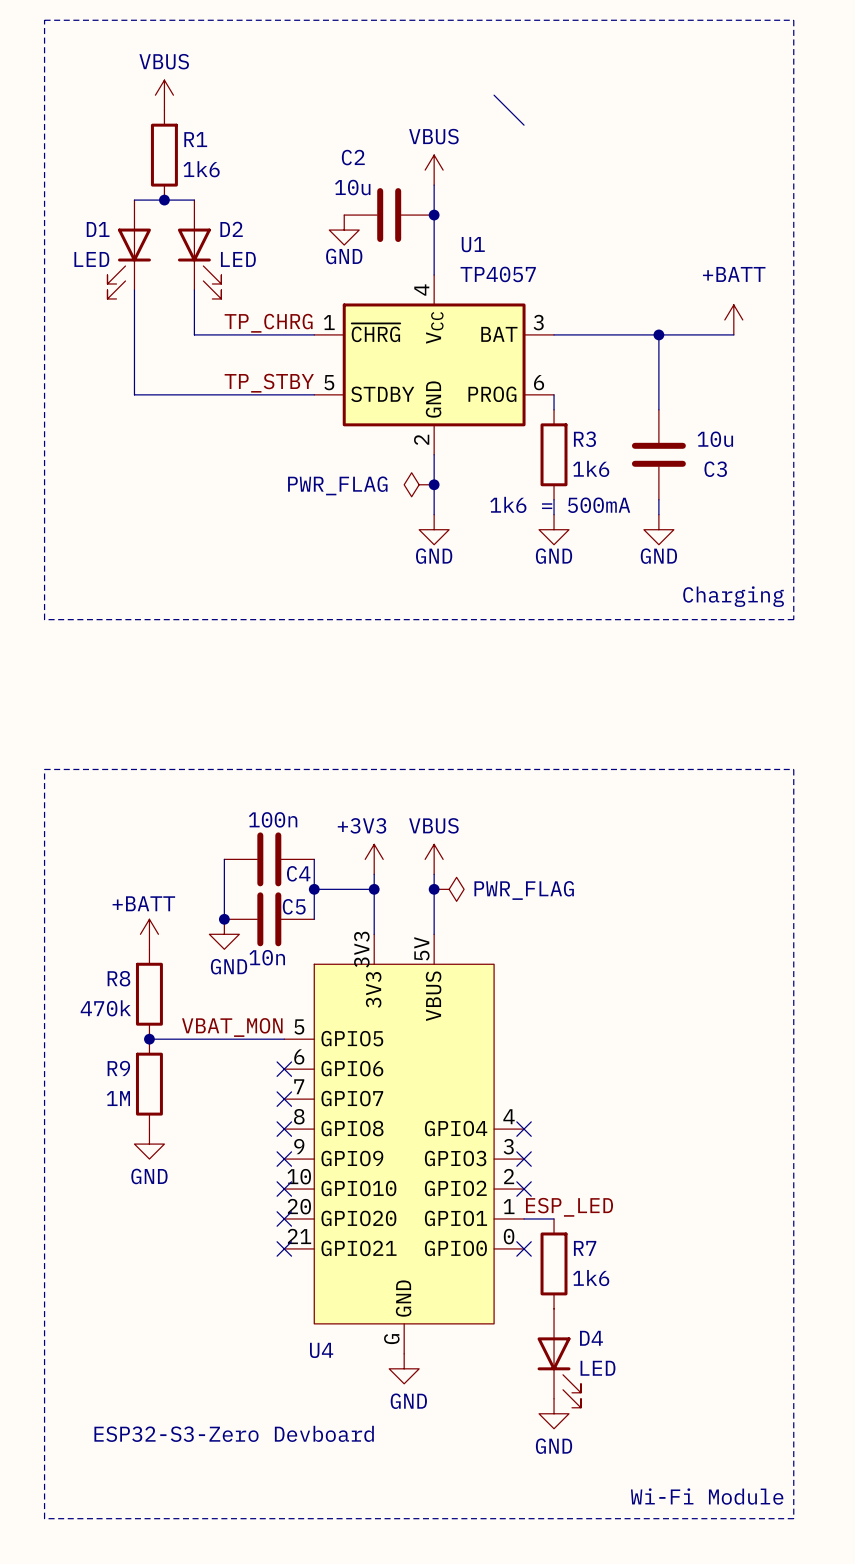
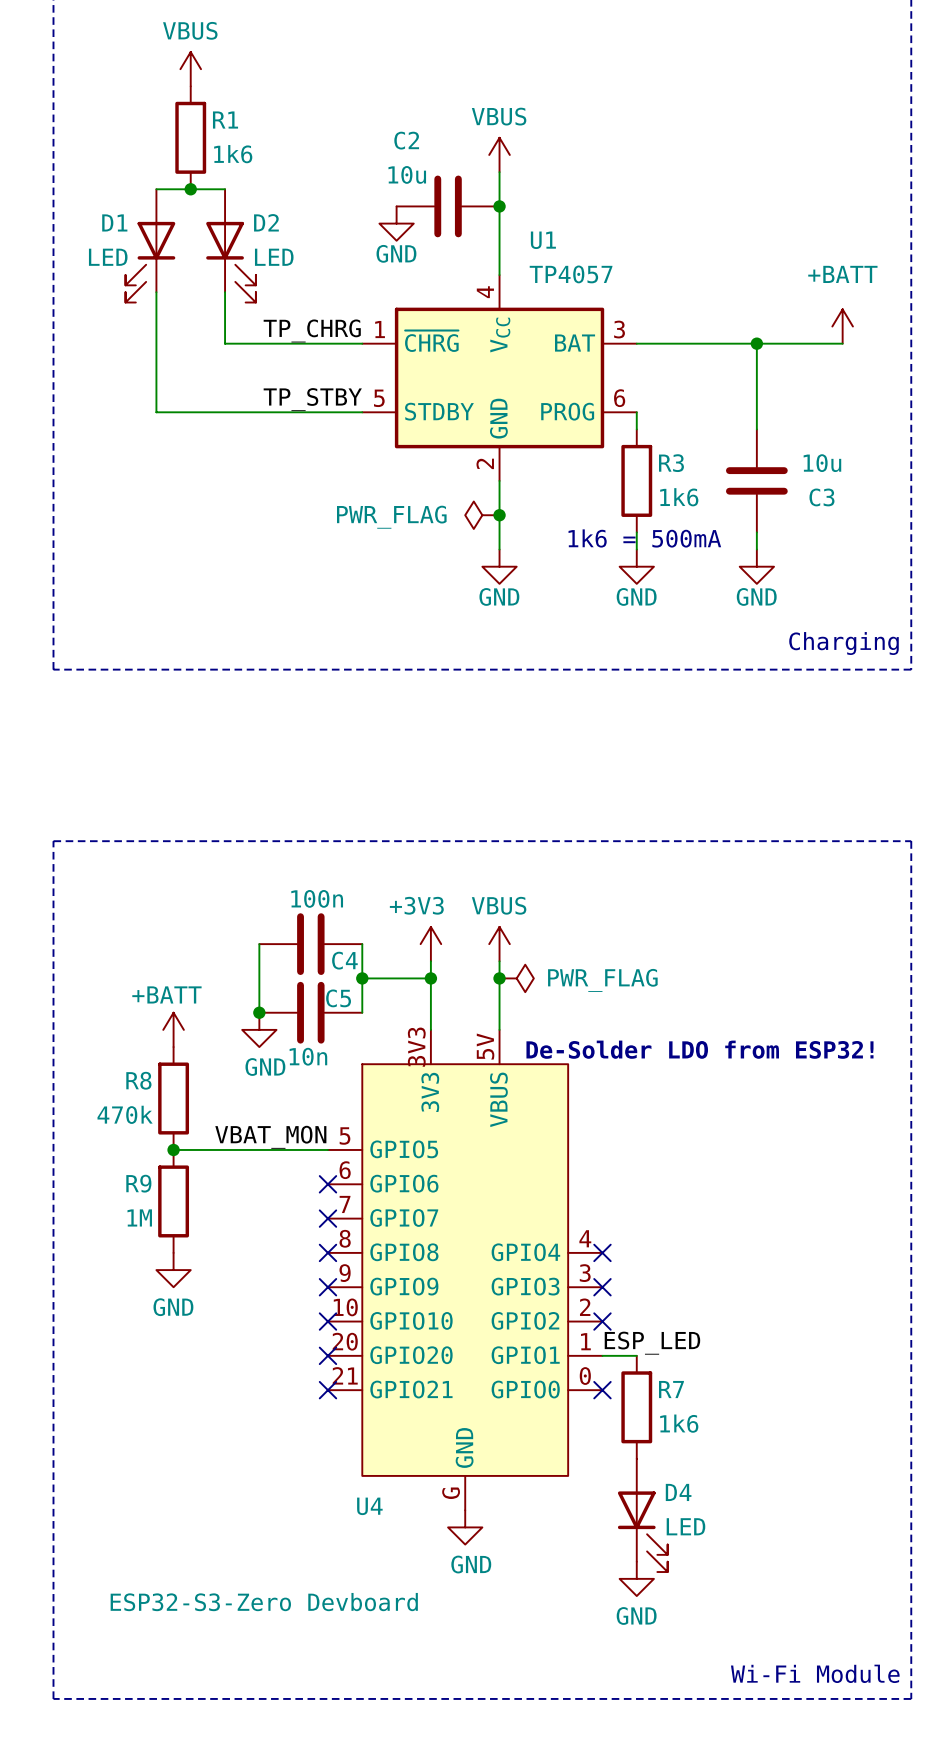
wire: (494, 95) (524, 125) -> none
text: none -> De-Solder LDO from ESP32! (699, 1049)

